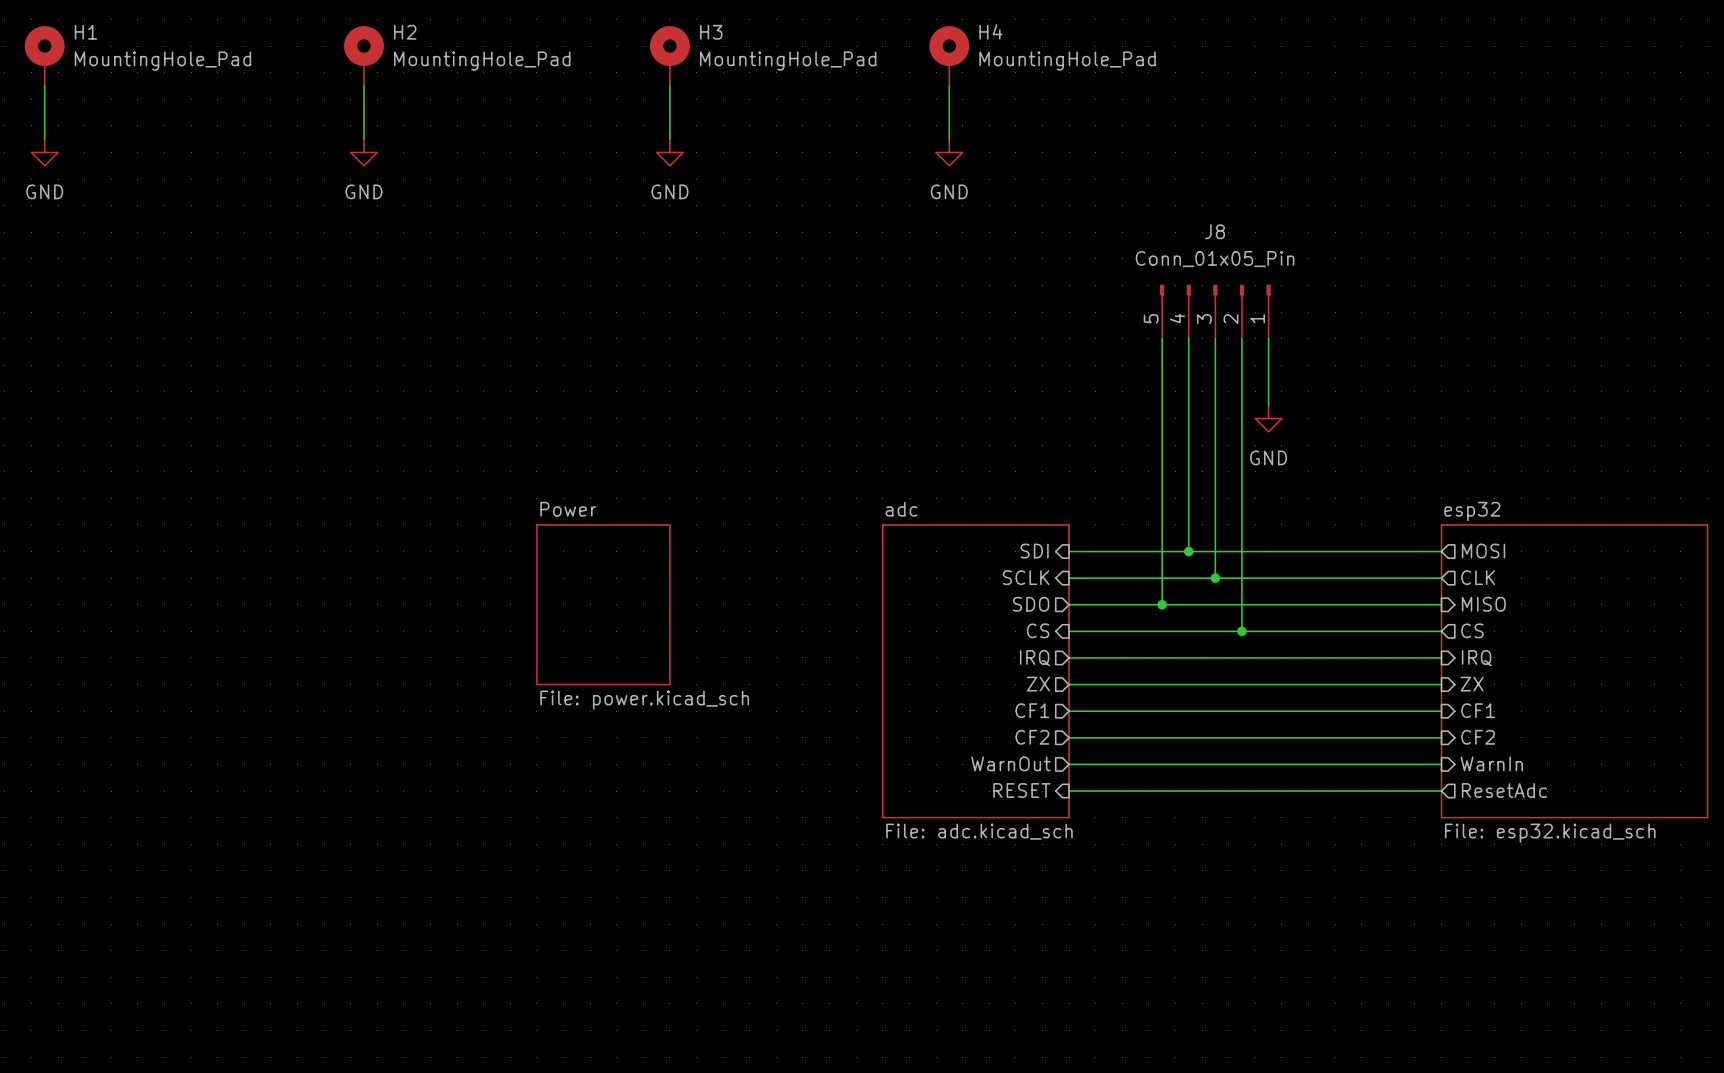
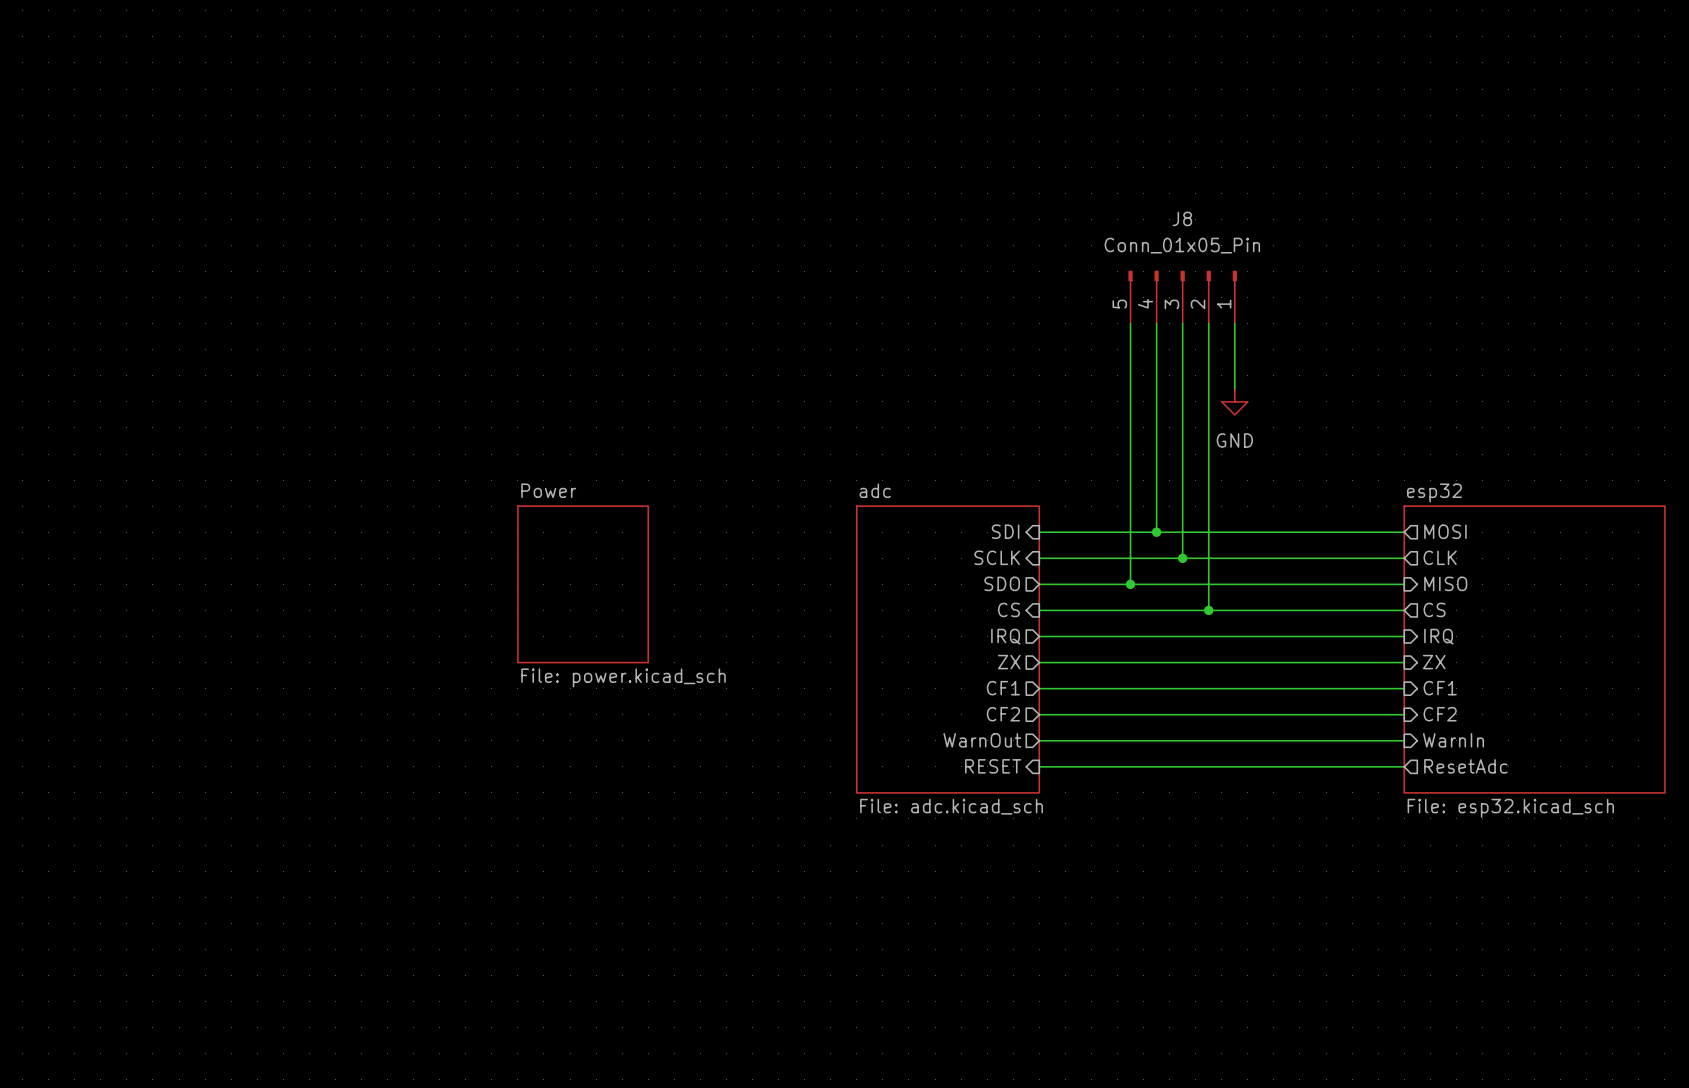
H1: MountingHole_Pad (44, 56) -> none
H2: MountingHole_Pad (363, 56) -> none
H3: MountingHole_Pad (669, 56) -> none
H4: MountingHole_Pad (949, 56) -> none
wire: (44, 85) (44, 139) -> none
wire: (363, 85) (363, 139) -> none
wire: (669, 85) (669, 139) -> none
wire: (949, 85) (949, 139) -> none
power symbol: GND (44, 152) -> none
power symbol: GND (363, 152) -> none
power symbol: GND (669, 152) -> none
power symbol: GND (949, 152) -> none

